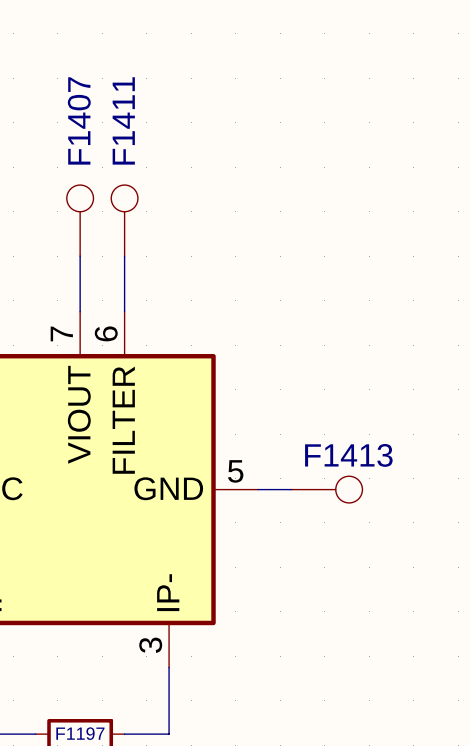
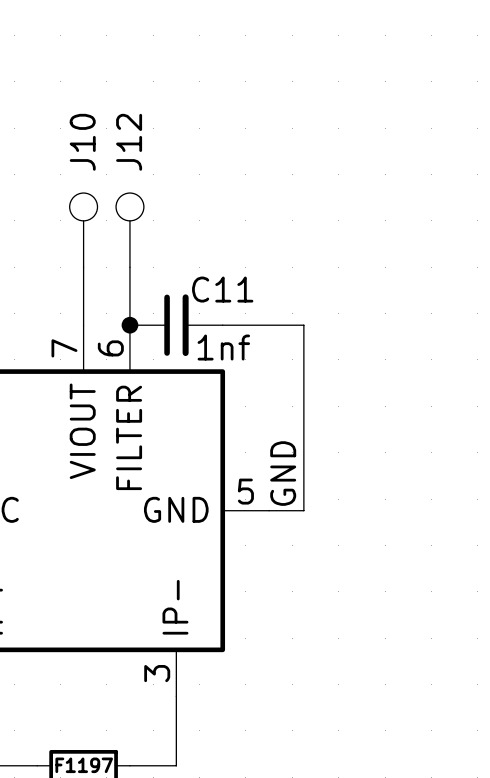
F1407 name: F1407 (79, 120) -> J10 (82, 142)
F1411 name: F1411 (123, 120) -> J12 (129, 142)
junction: none -> (129, 325)
C11: none -> 1nf (176, 325)
wire: none -> (222, 325) (303, 325) (303, 510)
label: none -> GND (283, 473)
F1413: (326, 489) -> none

